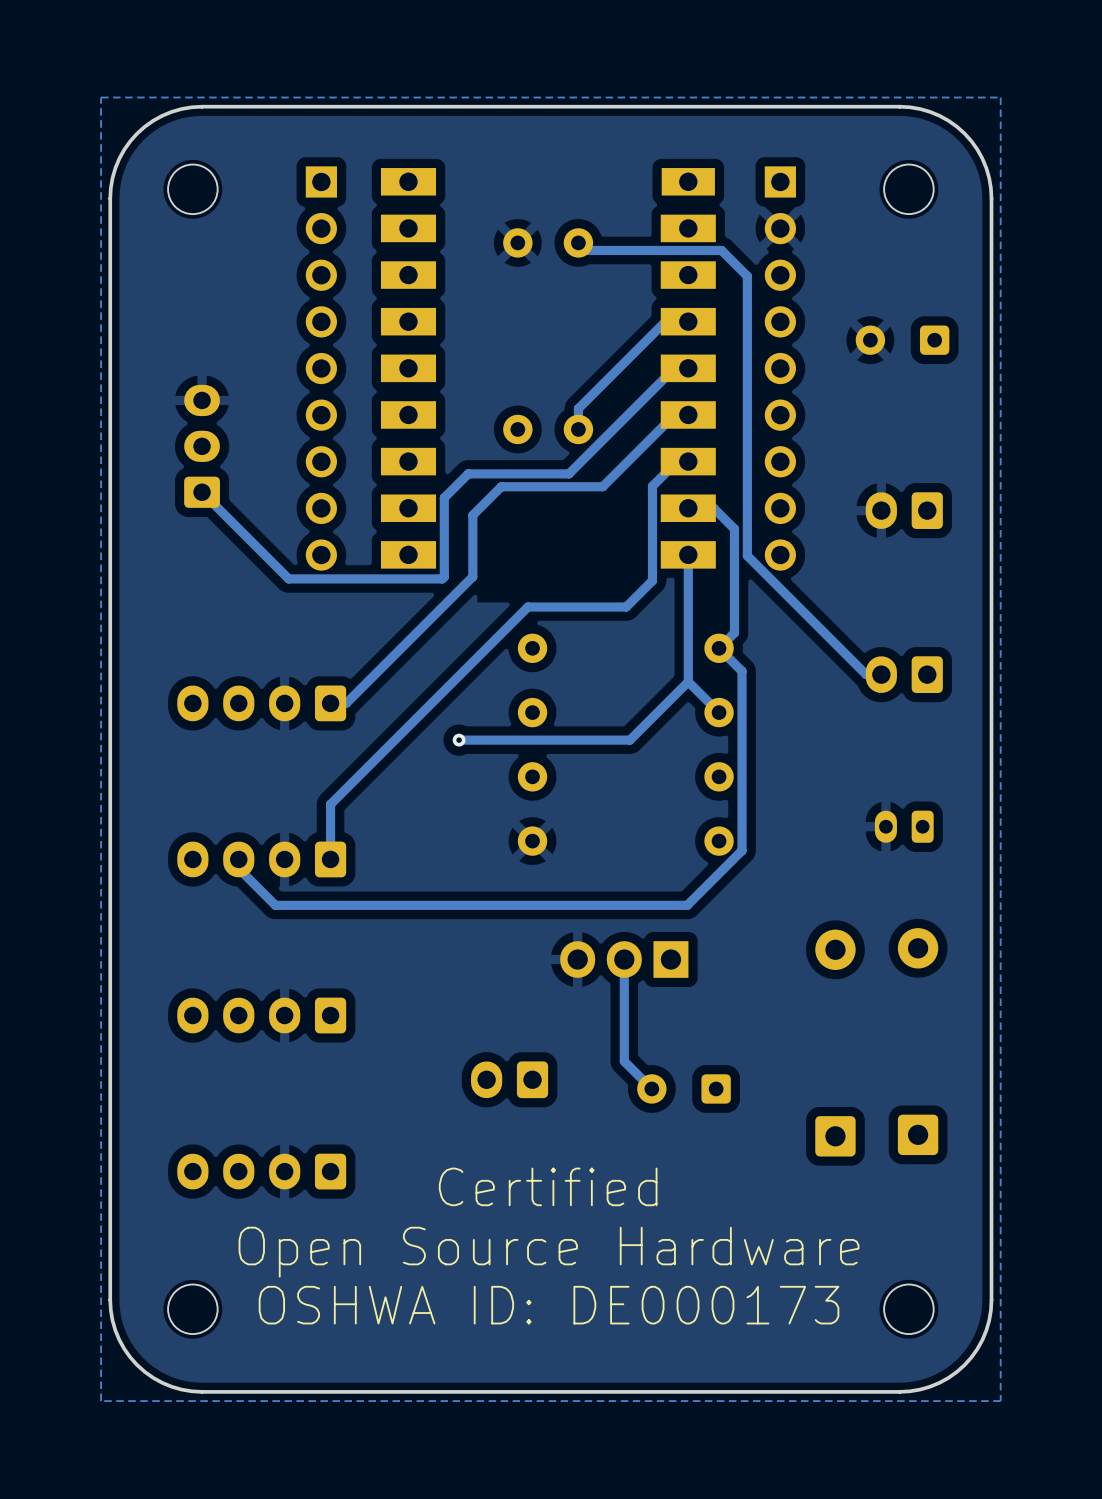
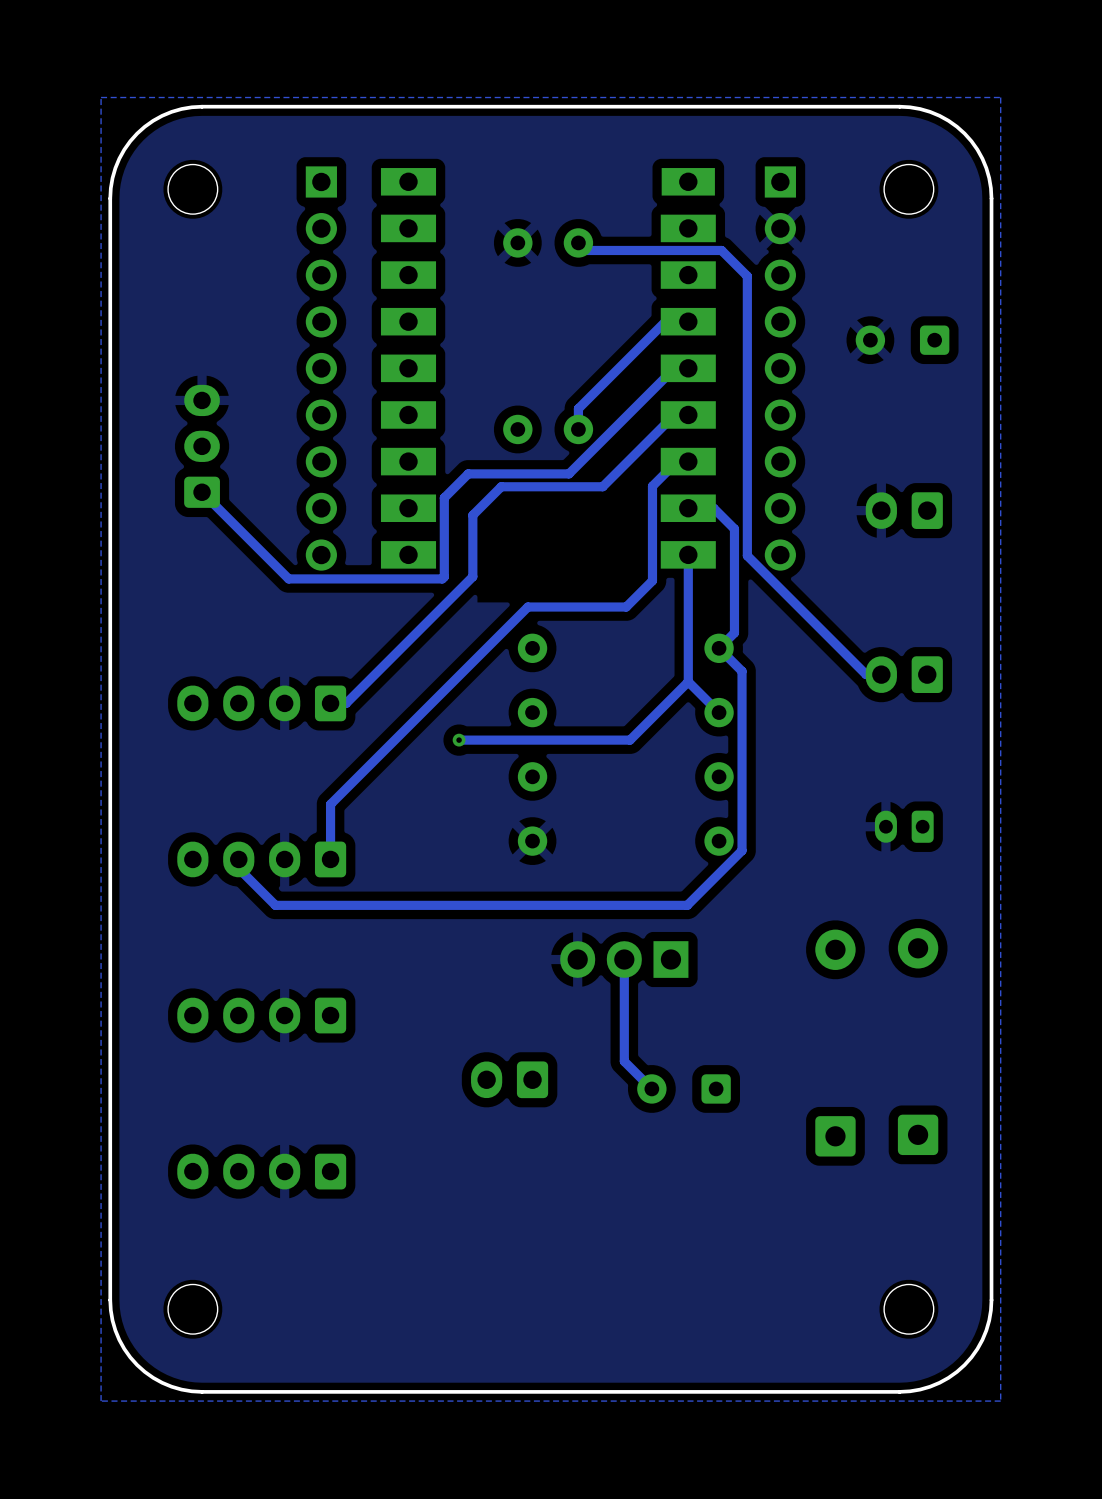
text: Certified (548, 1186) -> none
text: Open Source Hardware (549, 1252) -> none
text: OSHWA ID: DE000173 (549, 1305) -> none

